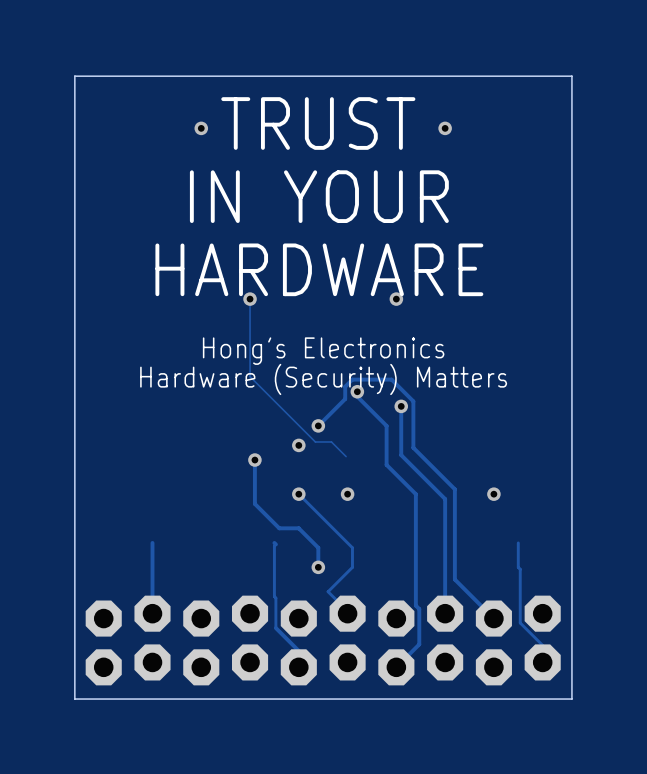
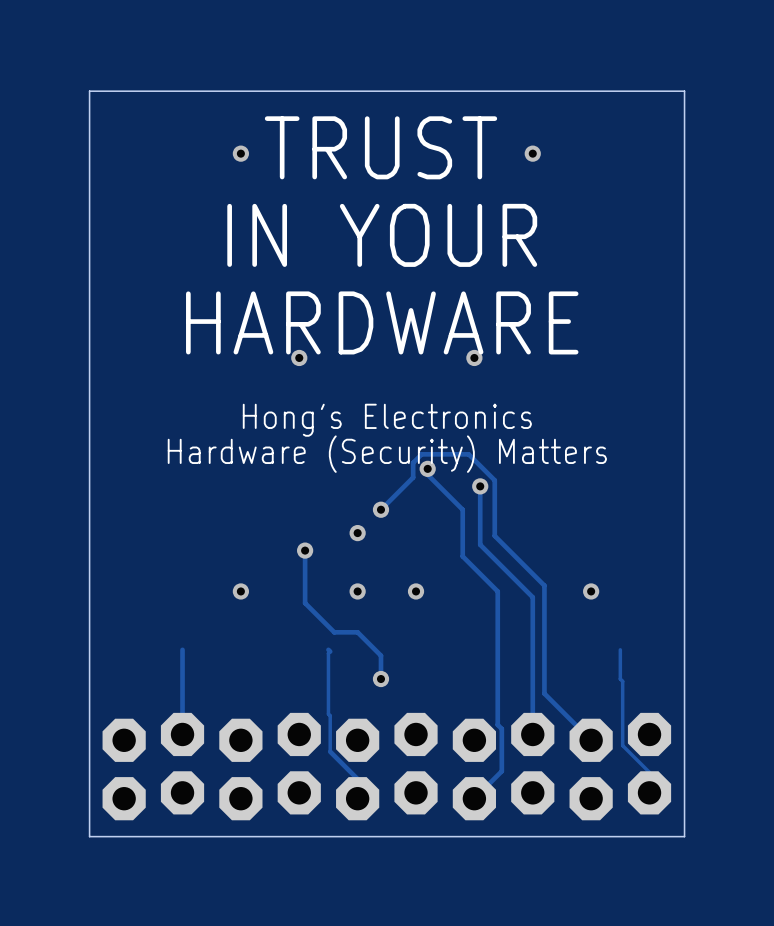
track: (250, 299) (250, 376) (315, 441) (331, 441) (346, 456) -> none
via: none -> (240, 591)
track: (298, 494) (352, 547) (352, 567) (328, 591) (347, 611) (347, 613) -> none

